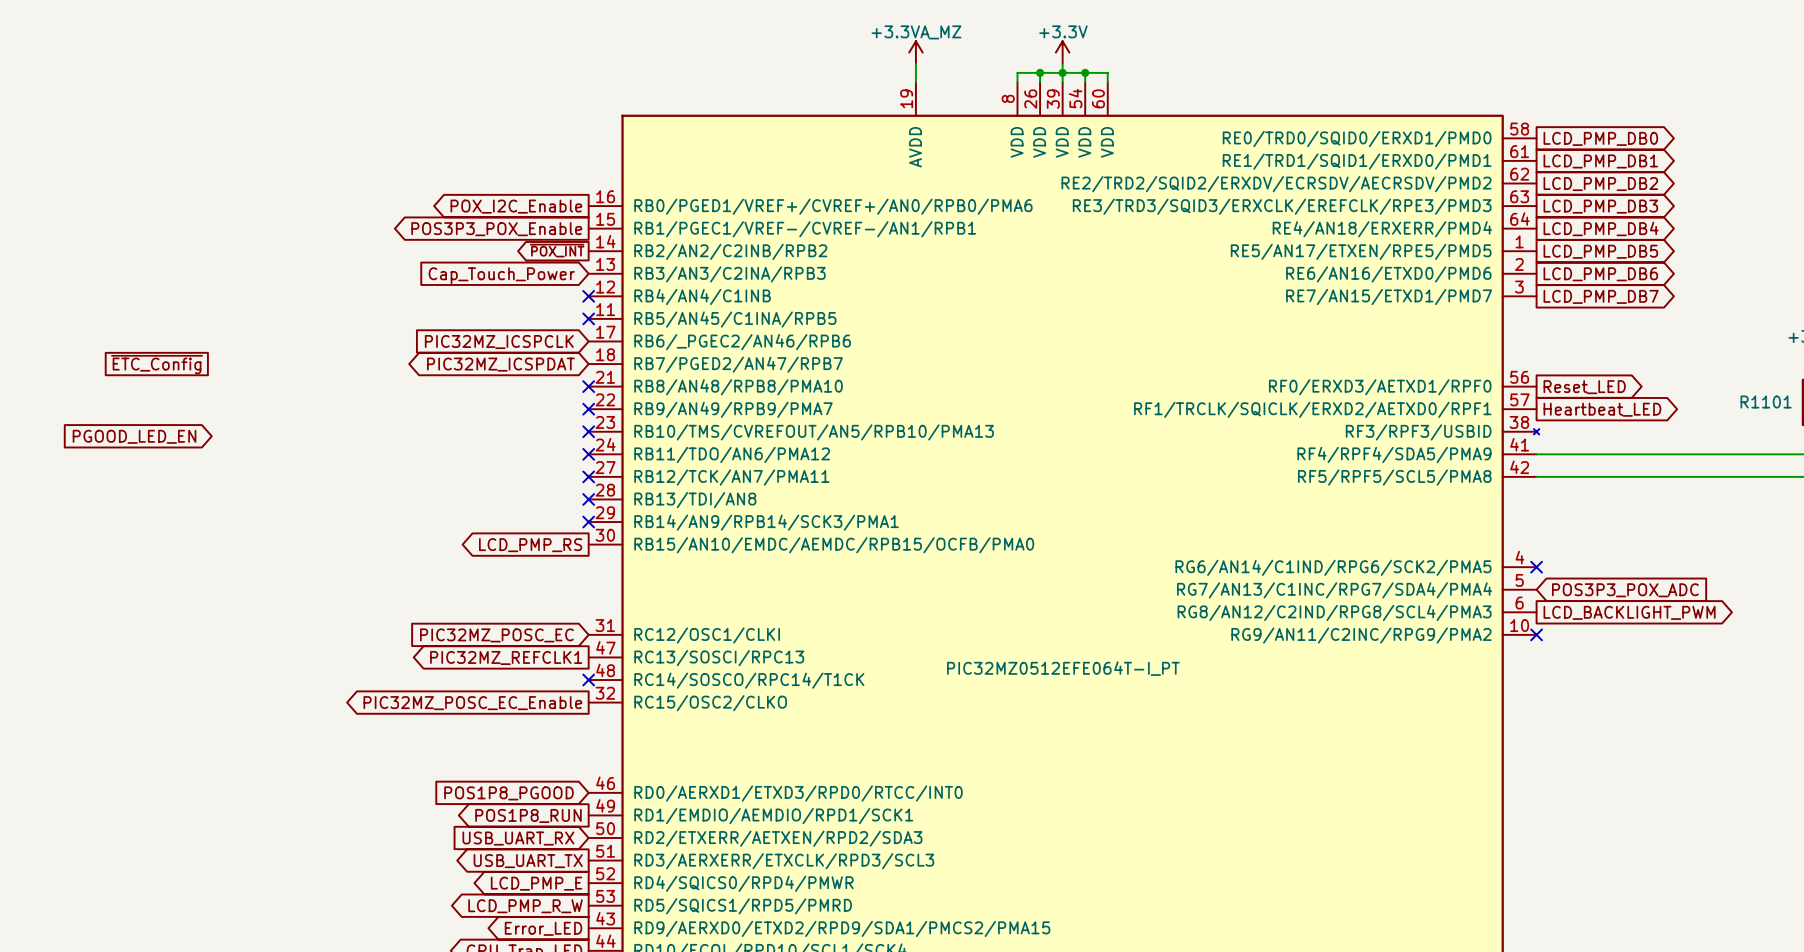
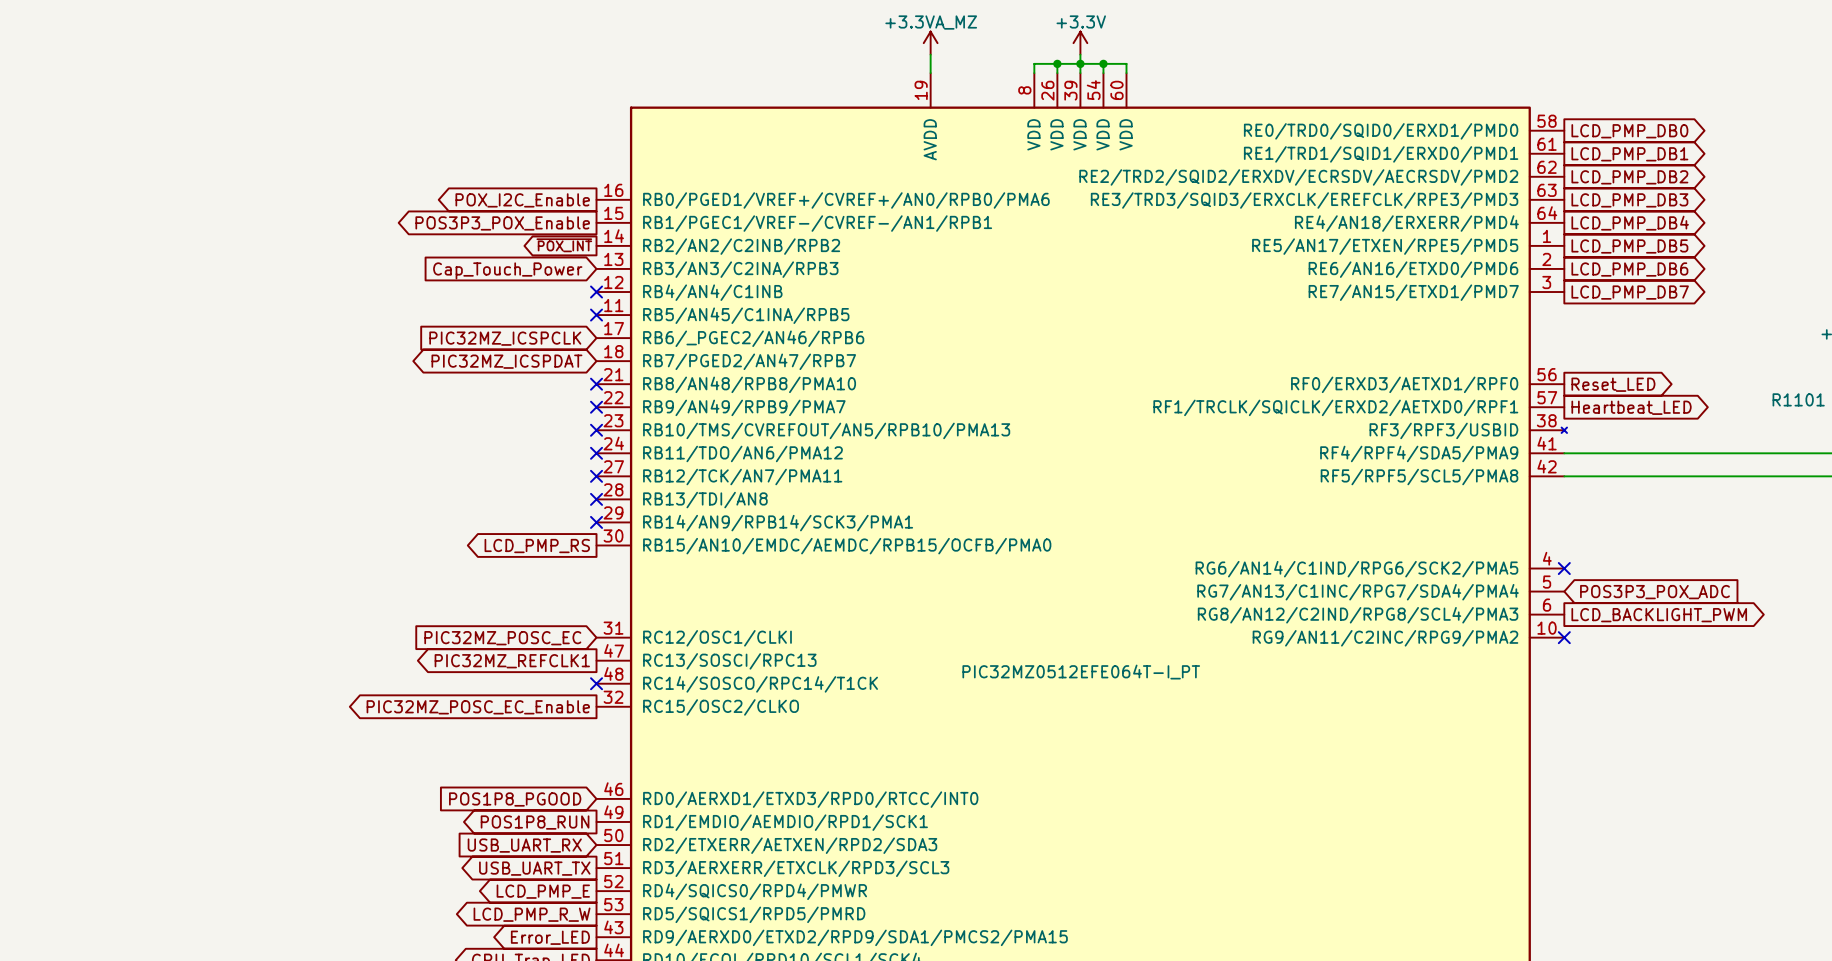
global label: ~{ETC_Config} (157, 364) -> none
global label: PGOOD_LED_EN (134, 436) -> none

